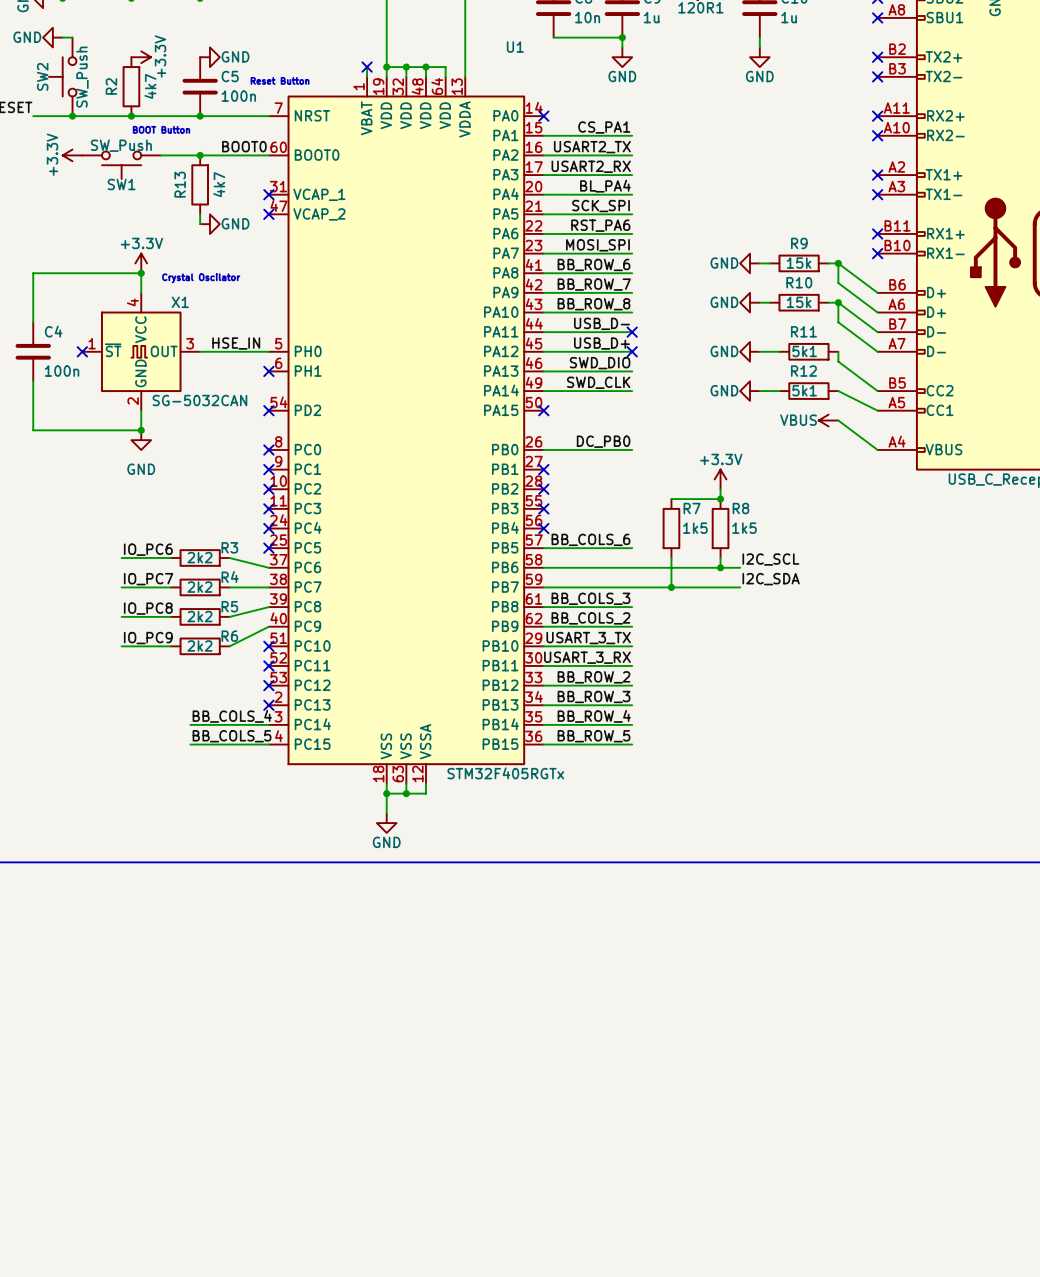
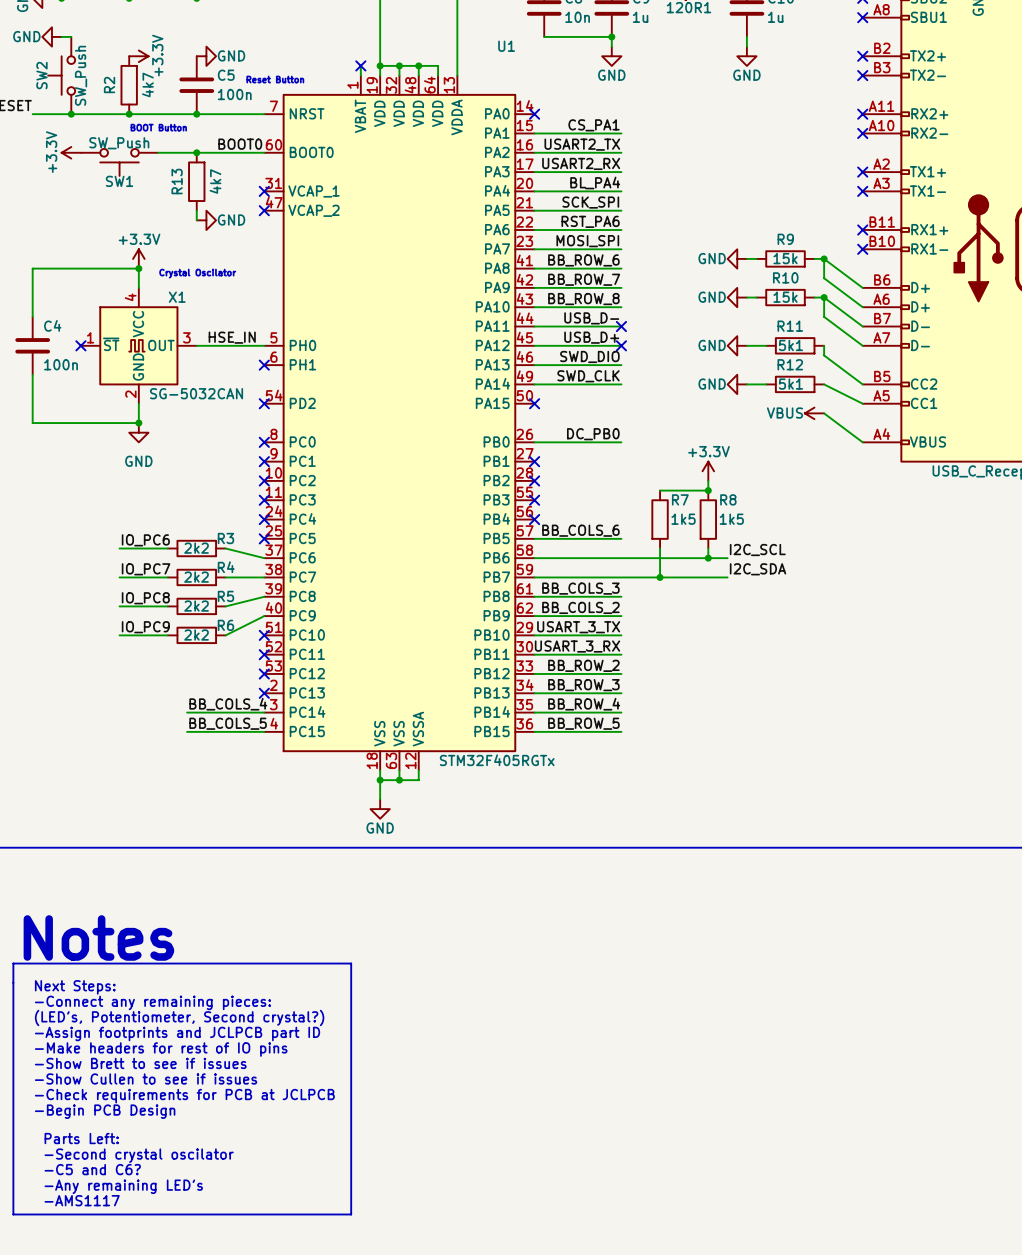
text: none -> Notes (98, 937)
line: none -> (13, 963) (13, 1214) (351, 1214) (351, 963) (13, 963)
text: none -> Next Steps: (75, 987)
text: none -> -Connect any remaining pieces: (152, 1002)
text: none -> (LED's, Potentiometer, Second crystal?) (179, 1017)
text: none -> -Assign footprints and JCLPCB part ID (177, 1033)
text: none -> -Make headers for rest of IO pins (161, 1049)
text: none -> -Show Brett to see if issues (140, 1063)
text: none -> -Show Cullen to see if issues (146, 1078)
text: none -> -Check requirements for PCB at JCLPCB (184, 1096)
text: none -> -Begin PCB Design (105, 1111)
text: none -> Parts Left: (81, 1138)
text: none -> -Second crystal oscilator (139, 1155)
text: none -> -C5 and C6? (92, 1169)
text: none -> -Any remaining LED's (123, 1186)
text: none -> -AMS1117 (82, 1200)

